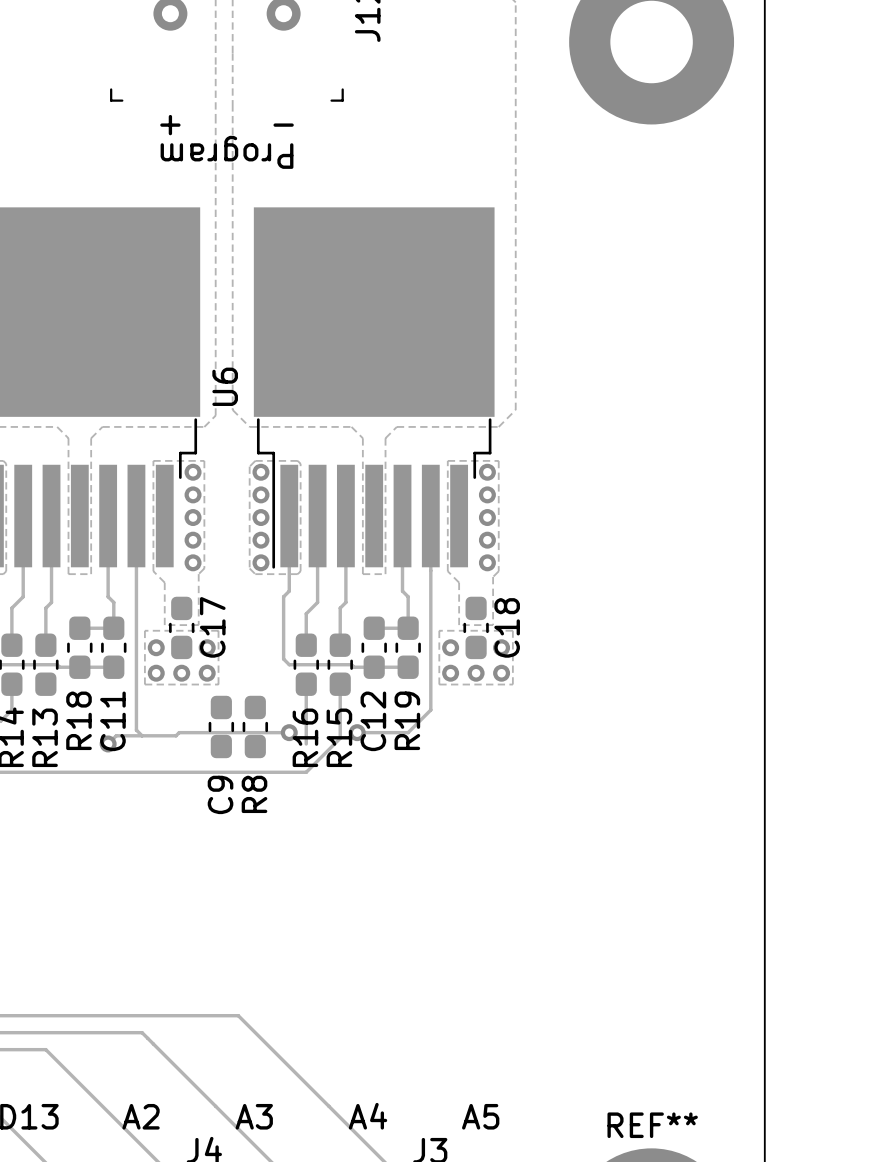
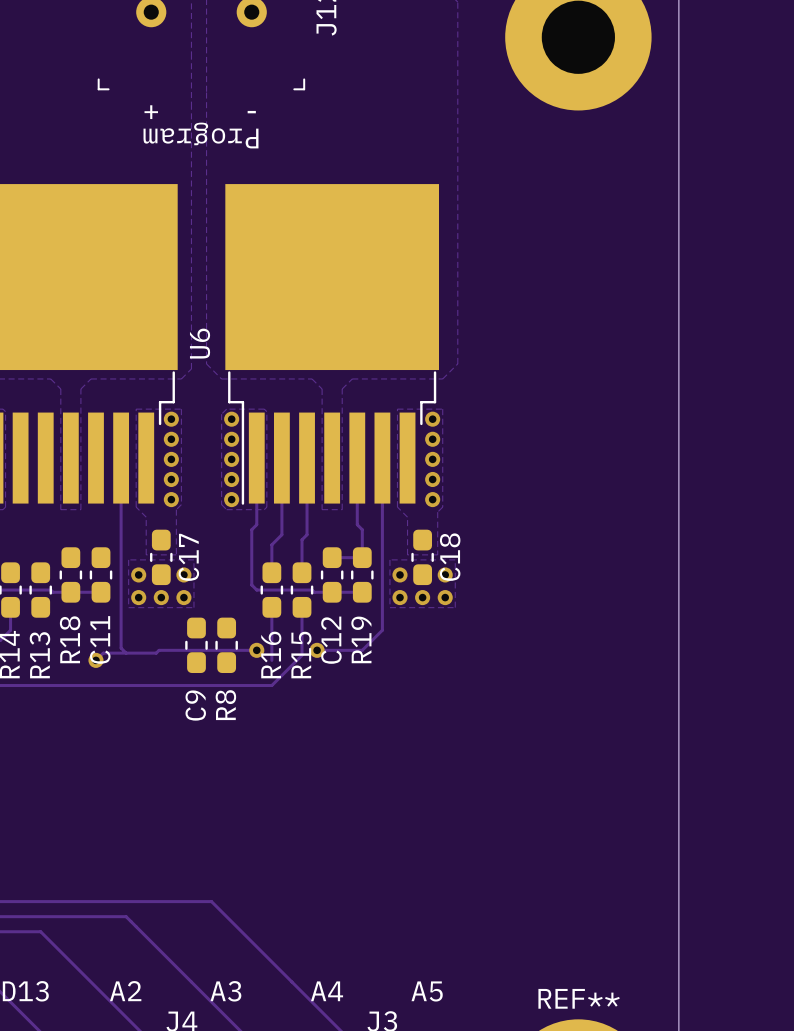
track: (23, 516) (23, 596) (11, 608) (11, 645) -> none
track: (51, 516) (51, 602) (45, 608) (45, 645) -> none
track: (108, 516) (108, 596) (113, 602) (113, 628) (79, 628) -> none

